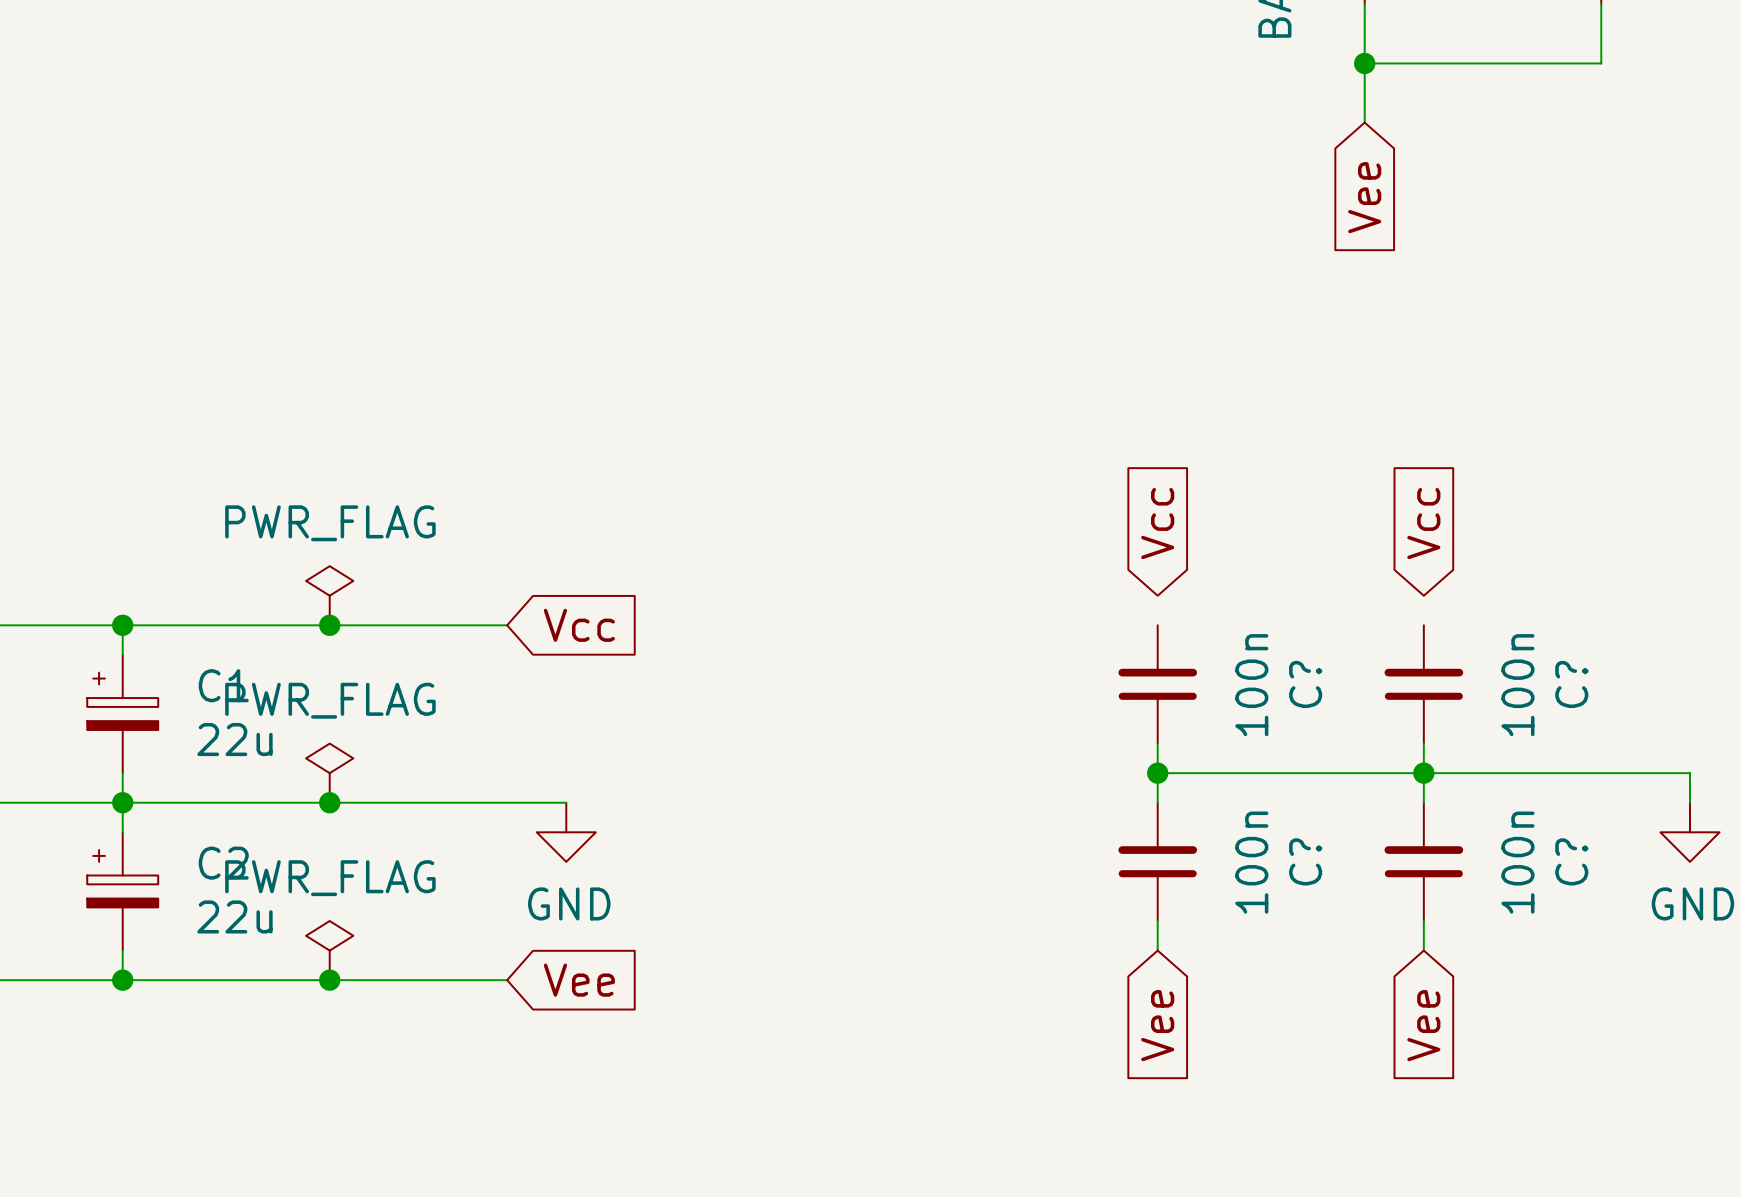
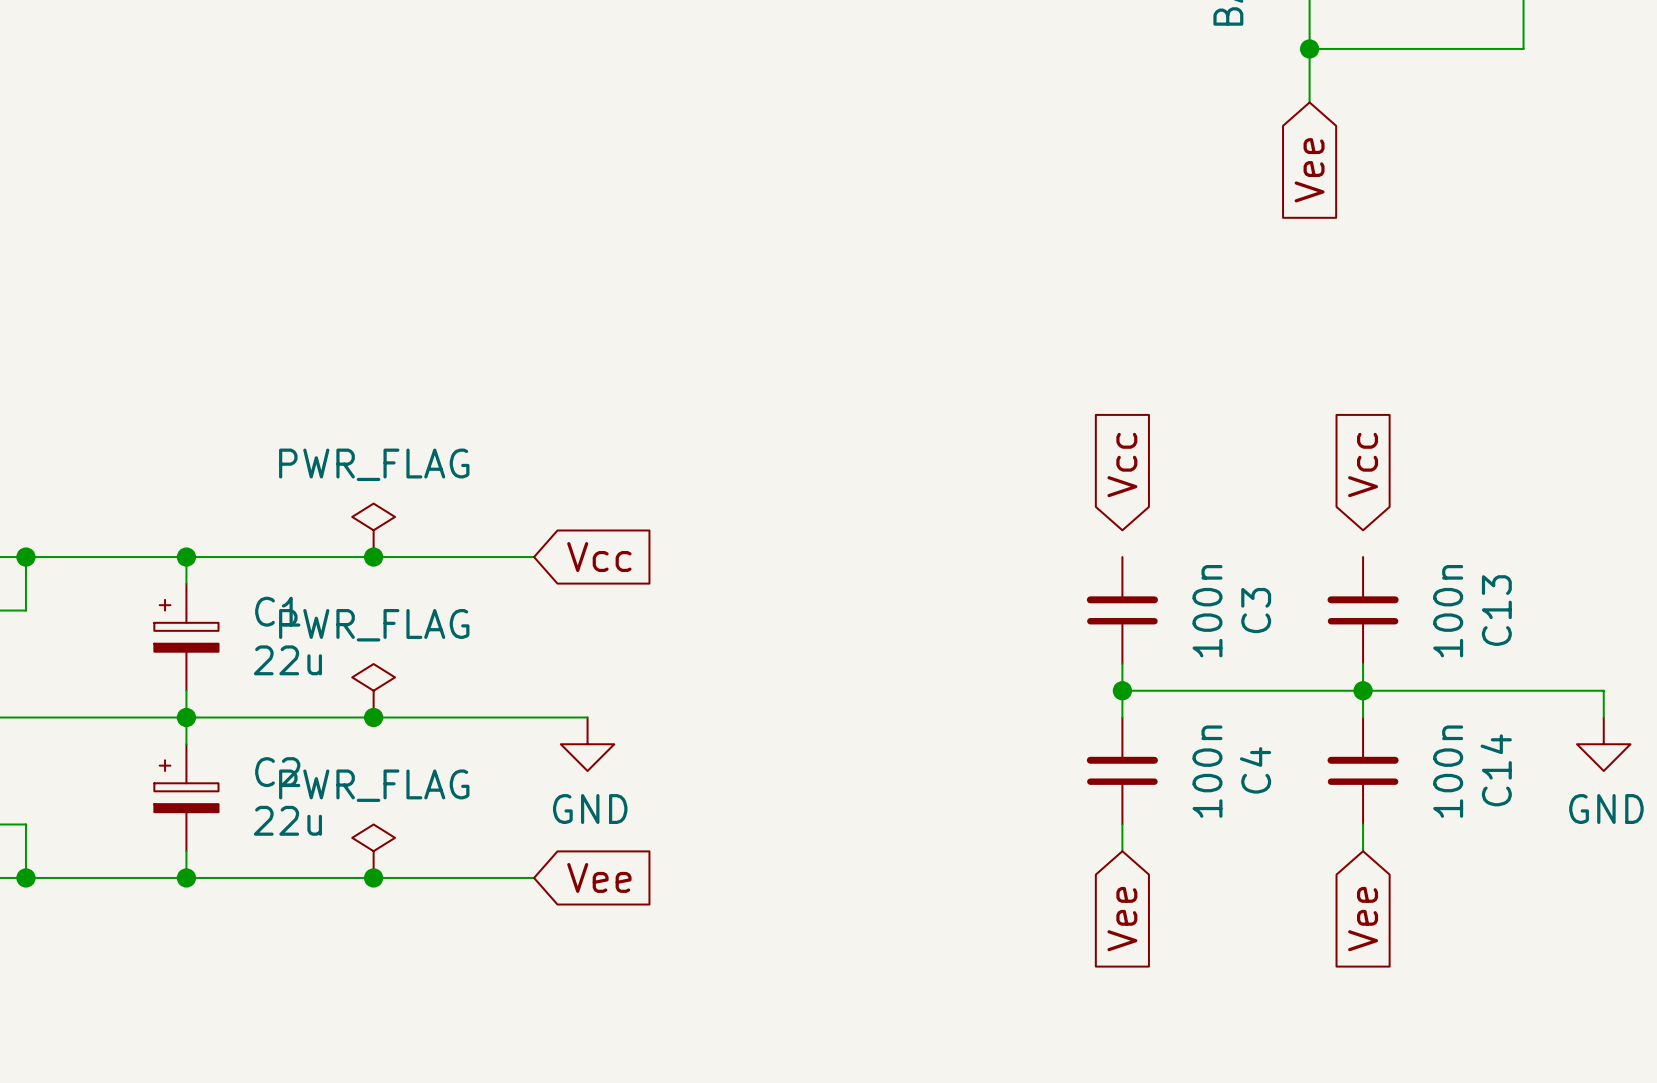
C? name: C? (1305, 684) -> C3 (1256, 610)
C? name: C? (1571, 684) -> C13 (1496, 610)
C? name: C? (1305, 861) -> C4 (1255, 770)
C? name: C? (1571, 861) -> C14 (1496, 770)

